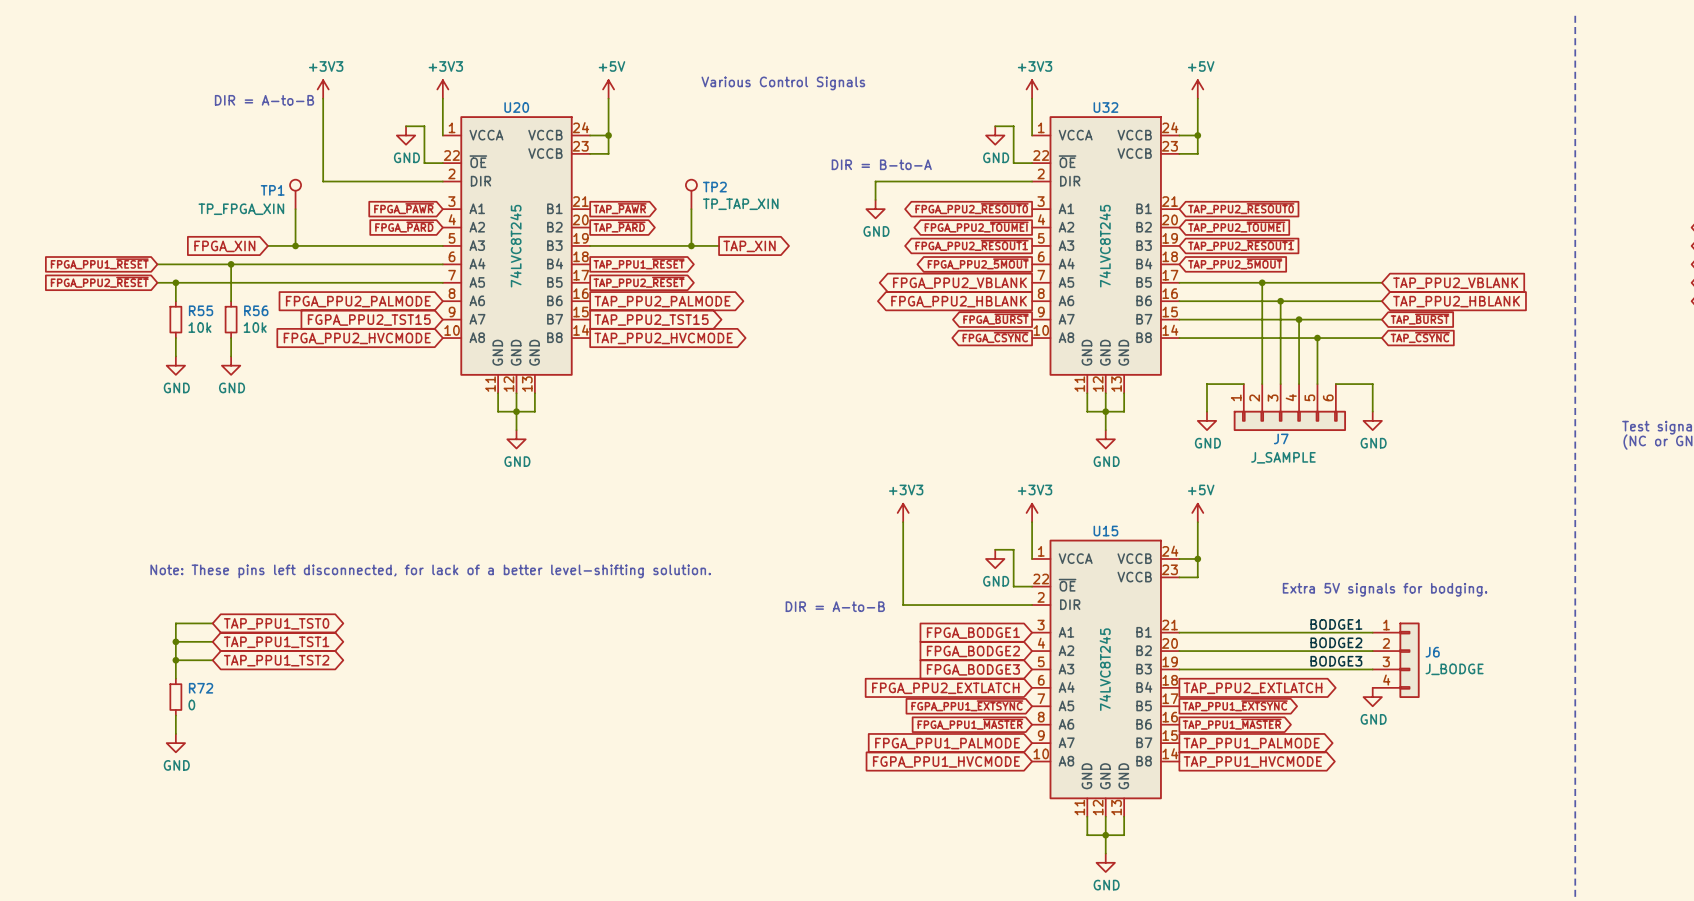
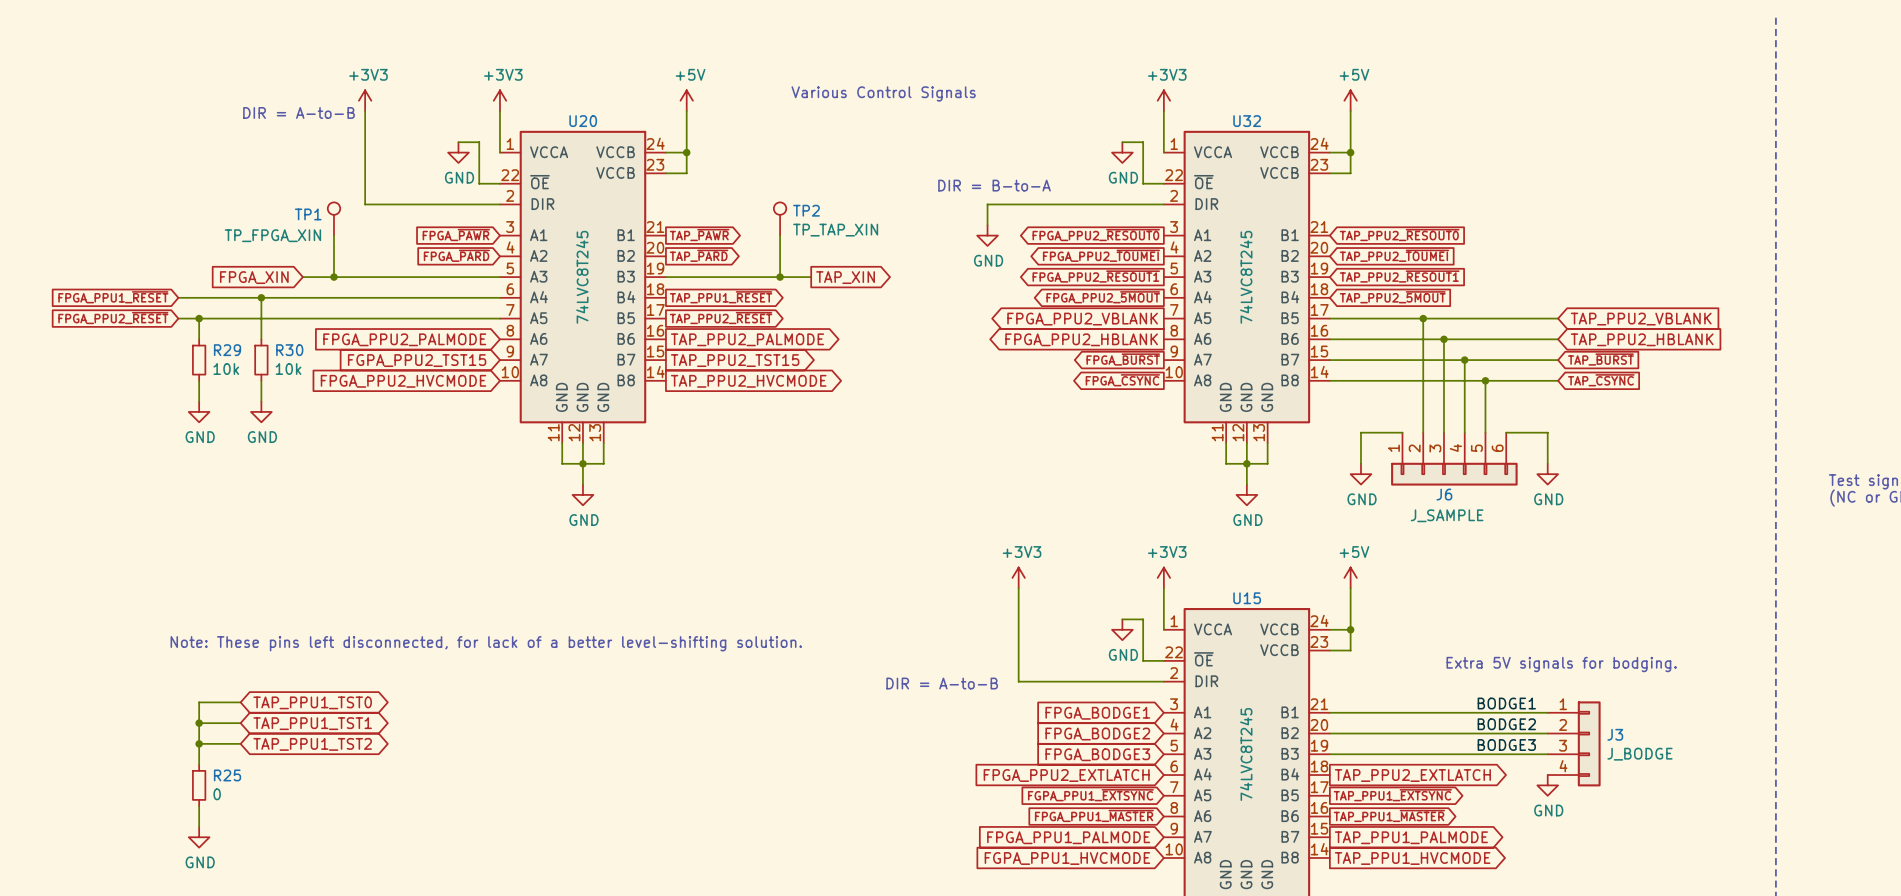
R55 name: R55 (201, 310) -> R29 (227, 350)
R56 name: R56 (256, 310) -> R30 (289, 350)
J7 name: J7 (1281, 438) -> J6 (1444, 494)
J6 name: J6 (1432, 652) -> J3 (1615, 734)
R72 name: R72 (201, 688) -> R25 (227, 775)

